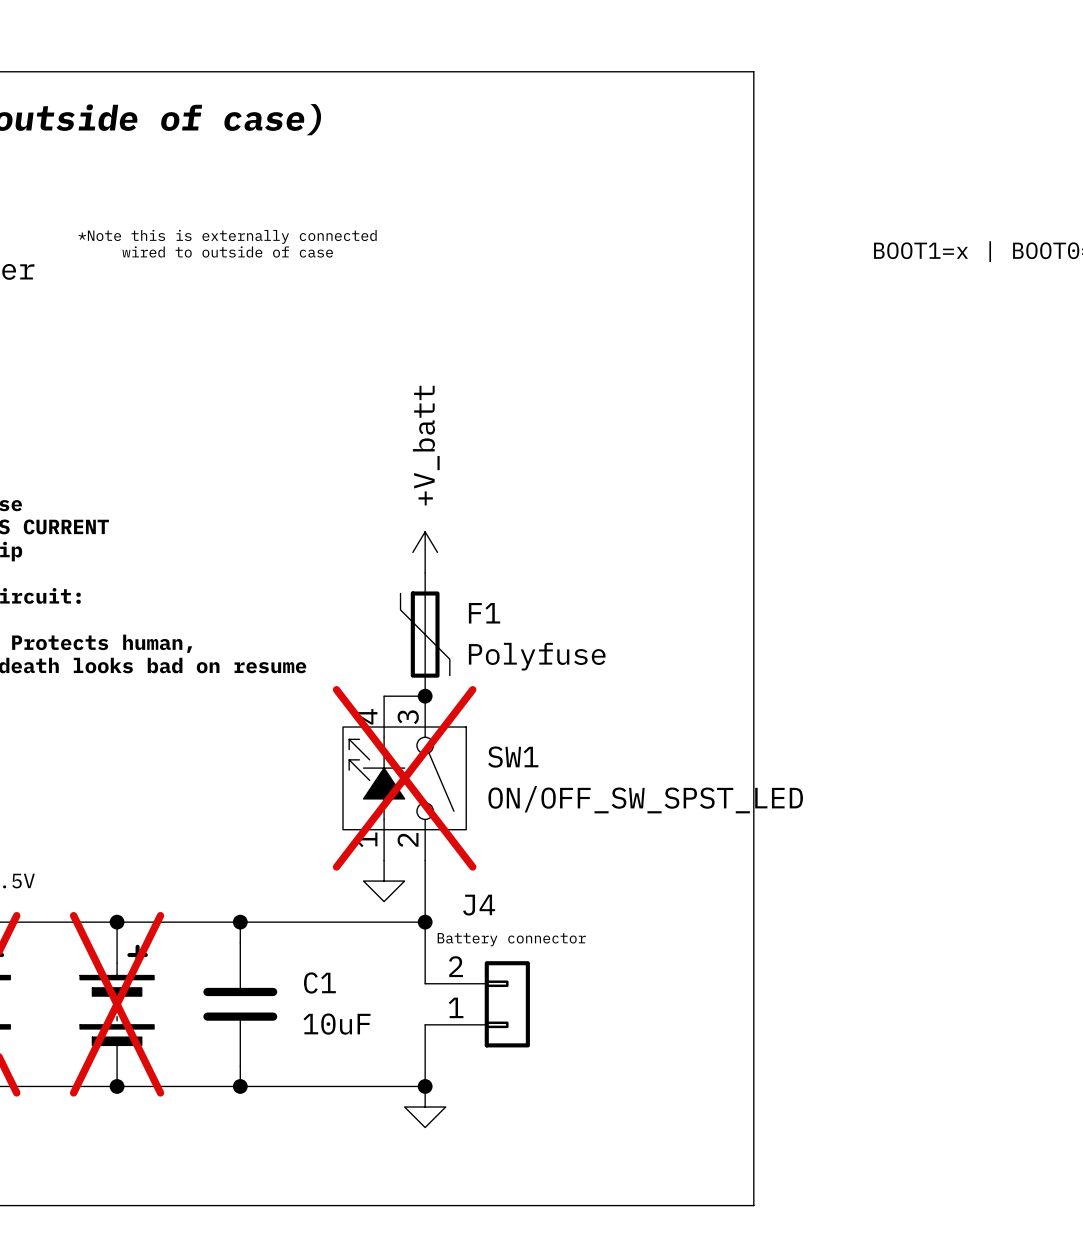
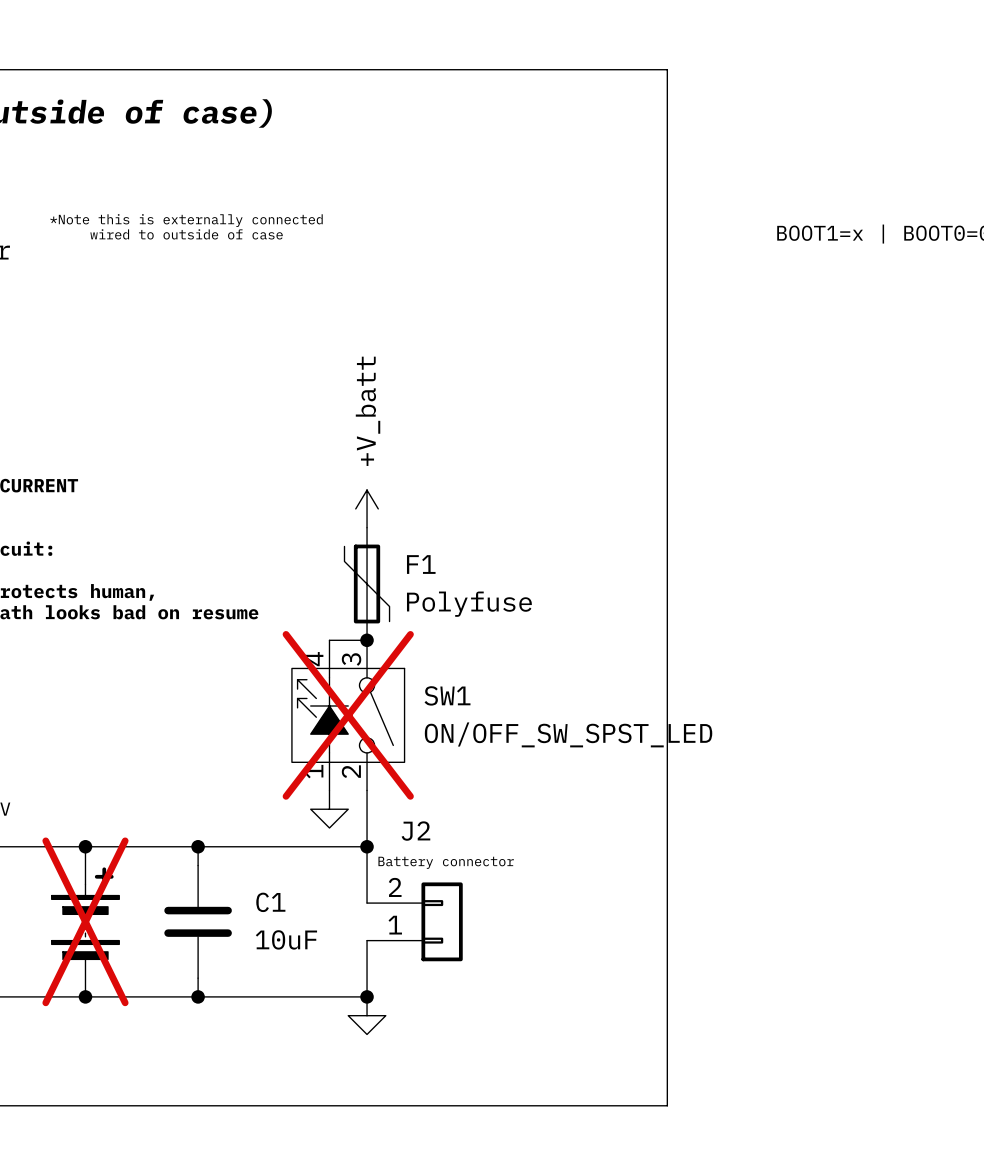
J4 name: J4 (479, 905) -> J2 (415, 831)

